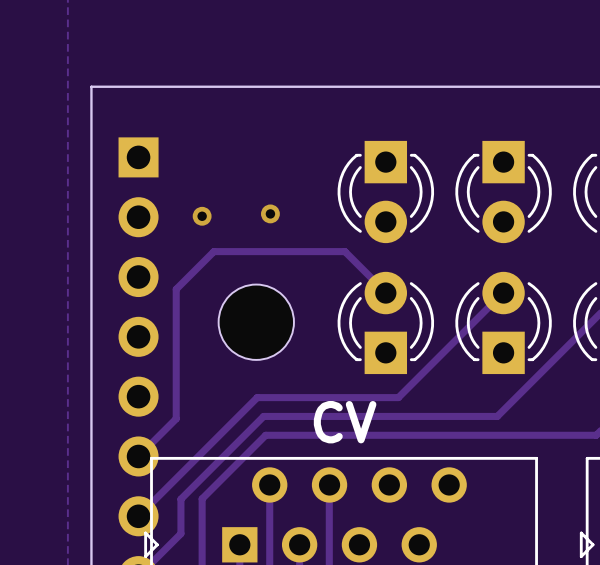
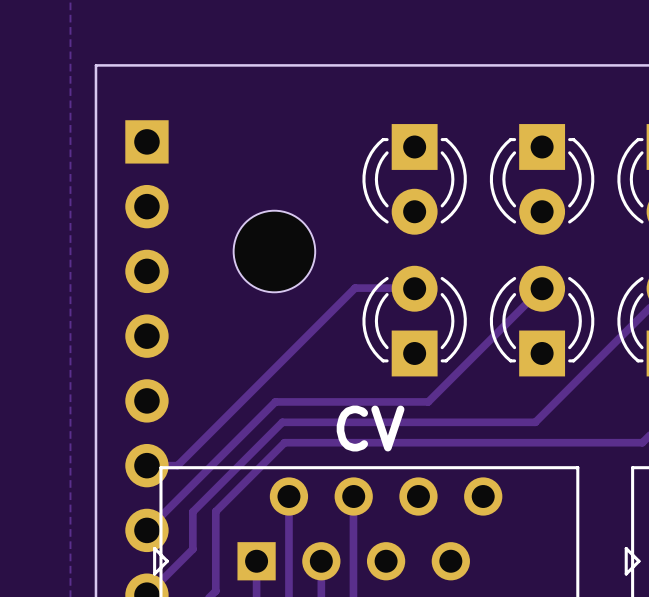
via: (270, 213) -> none
via: (202, 216) -> none
track: (385, 292) (344, 251) (213, 251) (176, 289) (176, 418) (138, 456) -> (414, 288) (355, 288) (177, 465) (146, 465)
part position: (256, 322) -> (274, 251)

